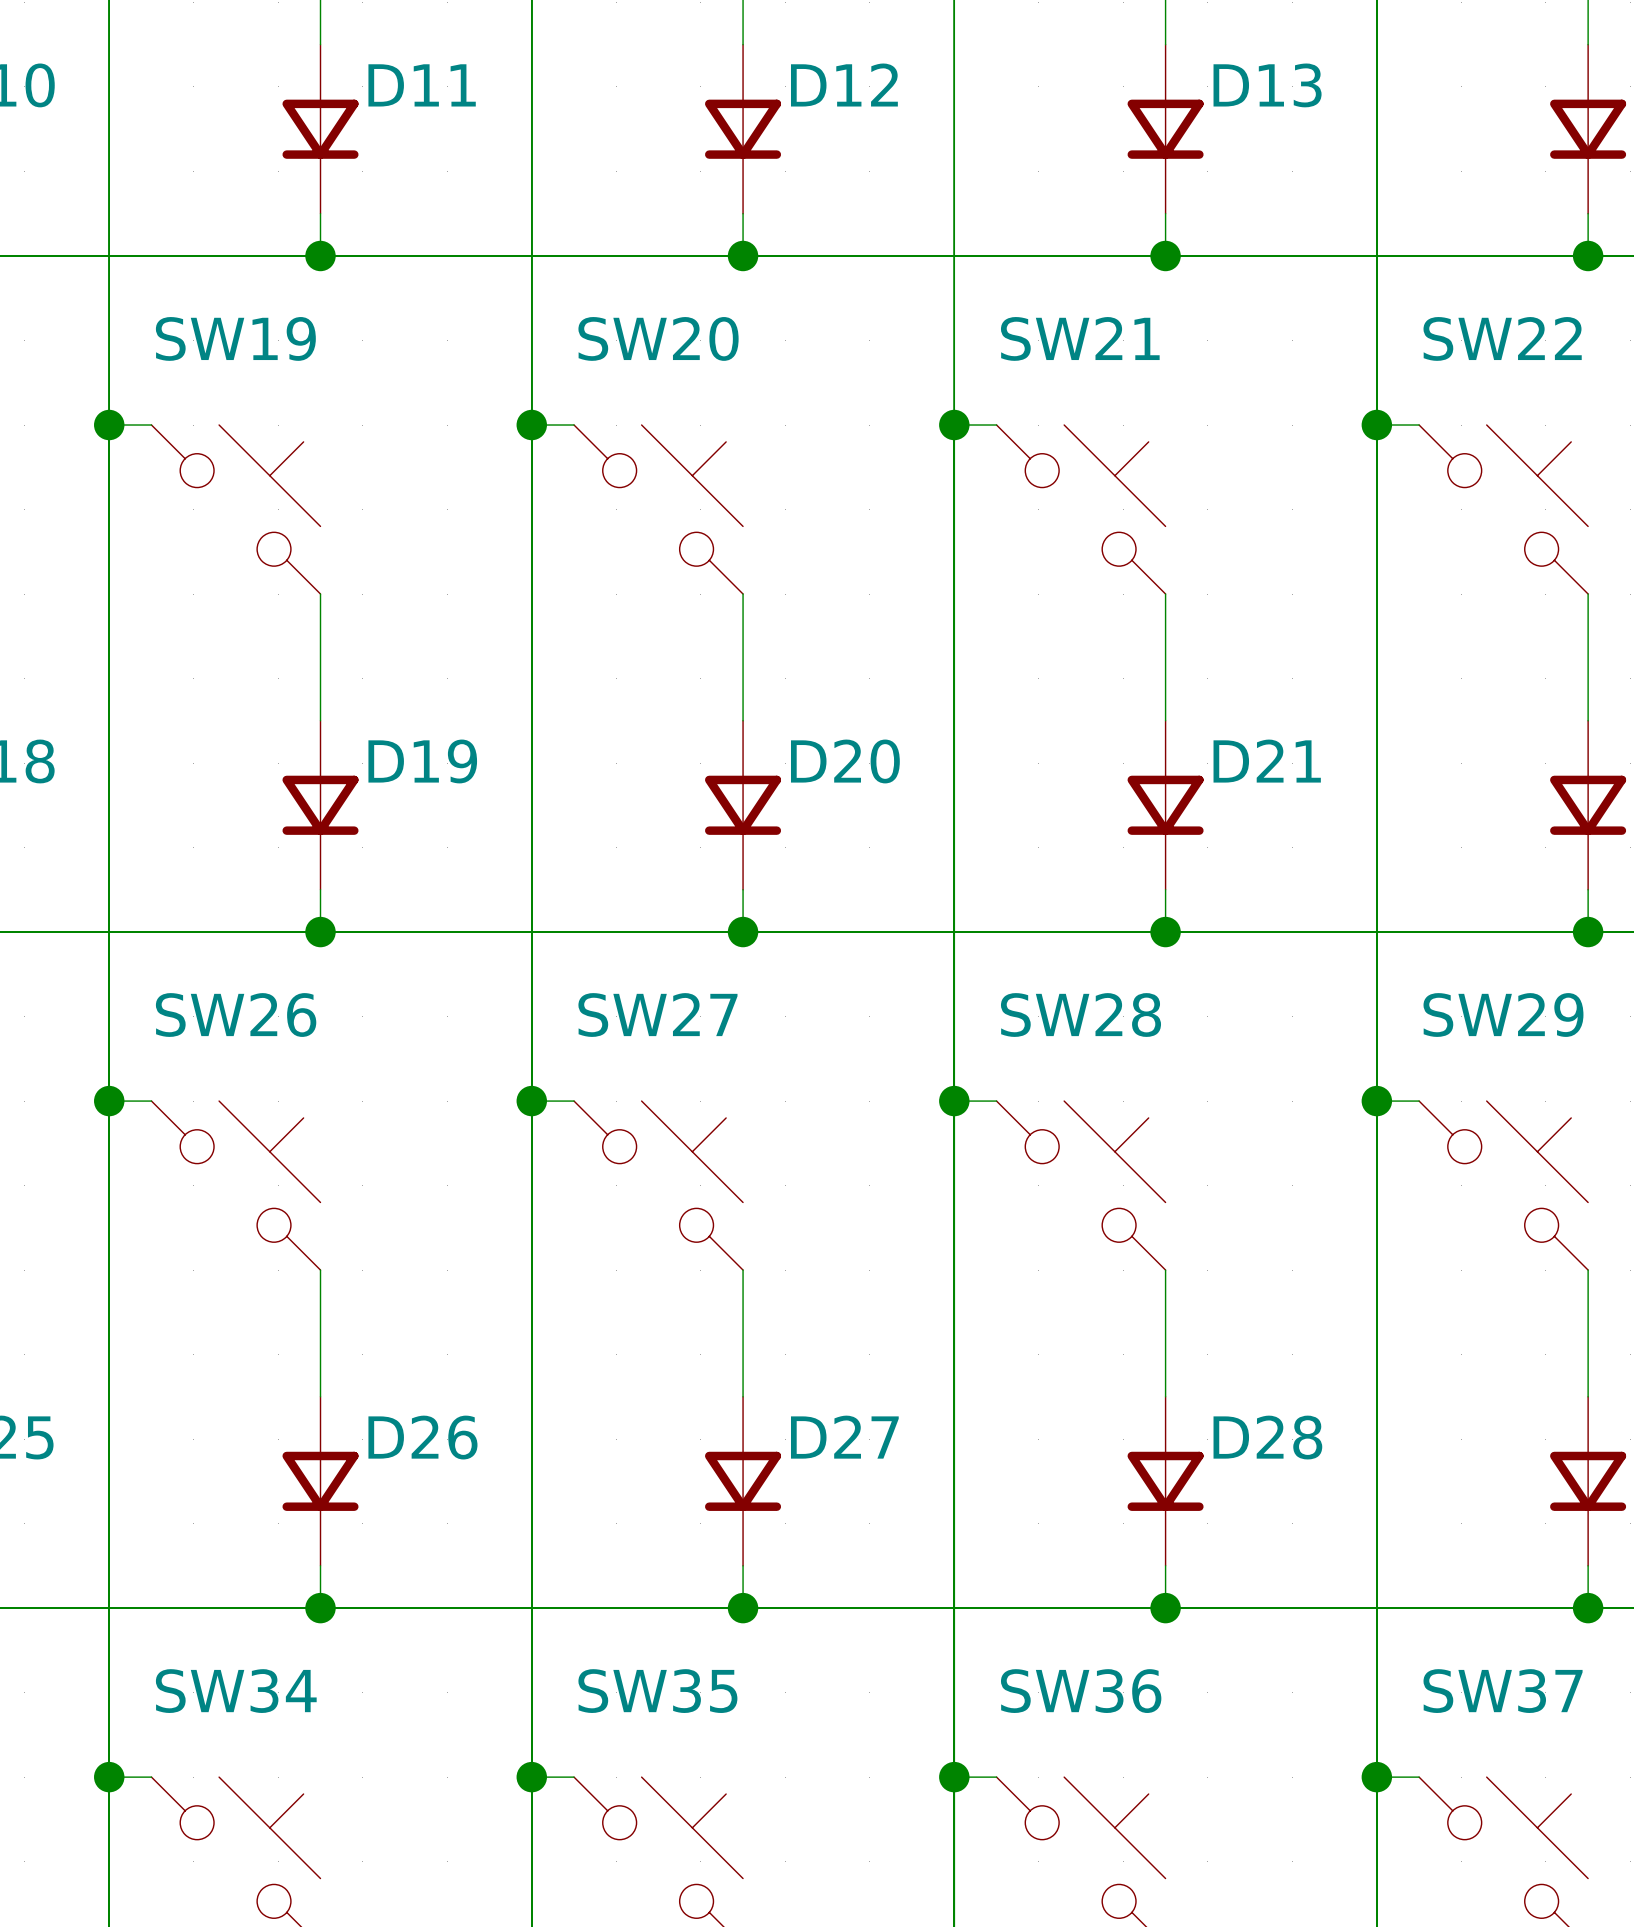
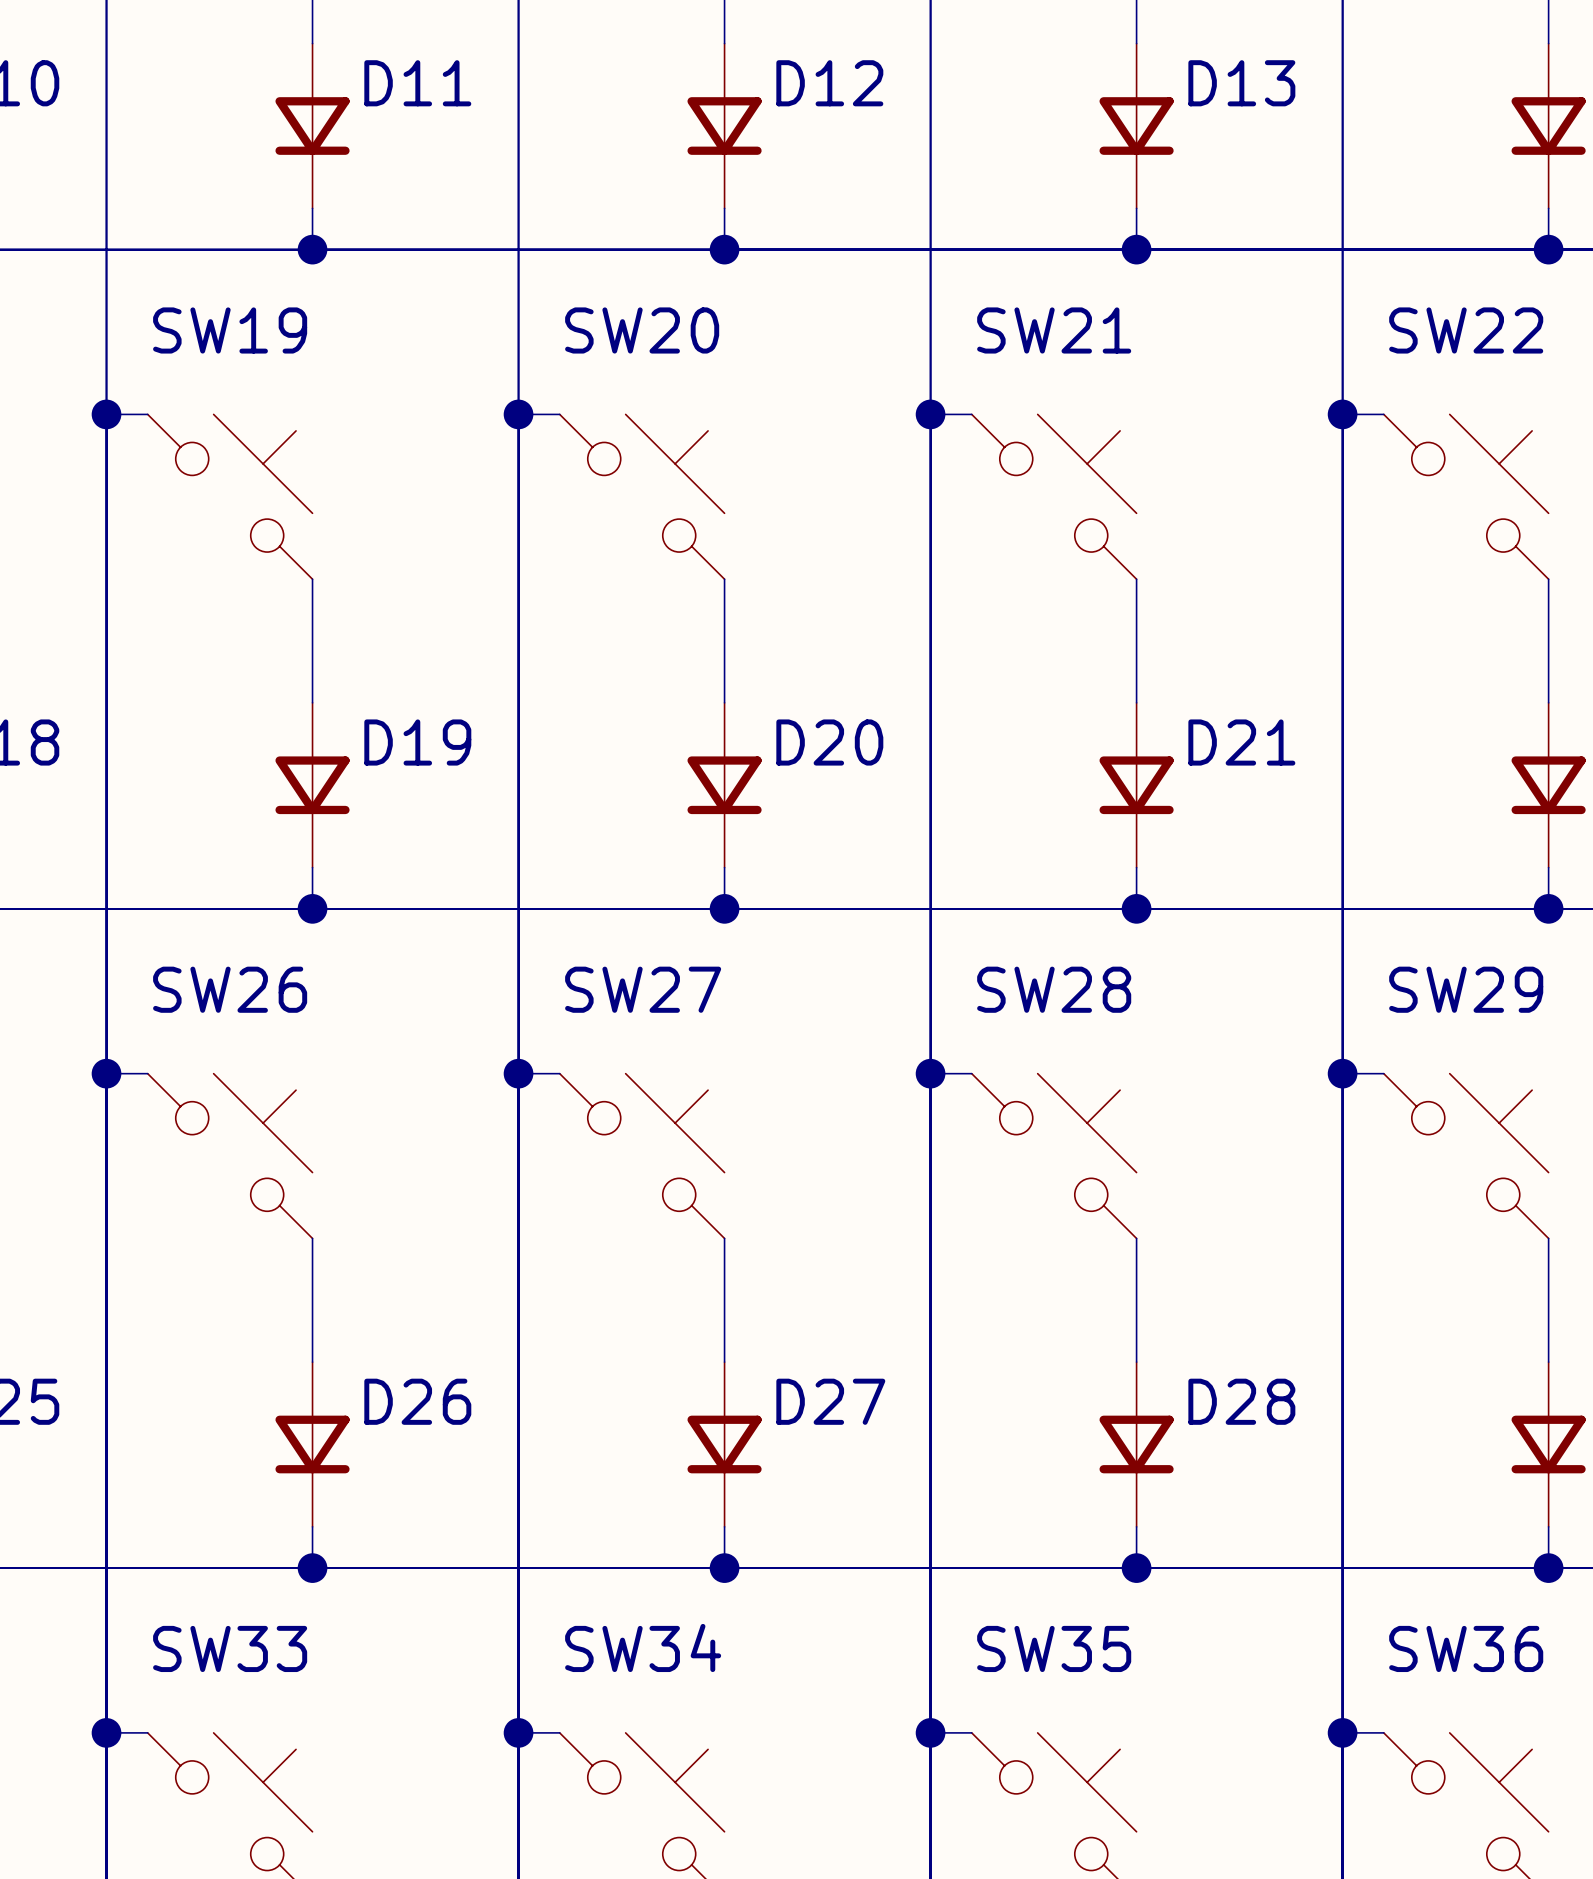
SW34 name: SW34 (236, 1691) -> SW33 (230, 1648)
SW35 name: SW35 (657, 1691) -> SW34 (643, 1647)
SW36 name: SW36 (1081, 1691) -> SW35 (1054, 1648)
SW37 name: SW37 (1503, 1691) -> SW36 (1466, 1648)

